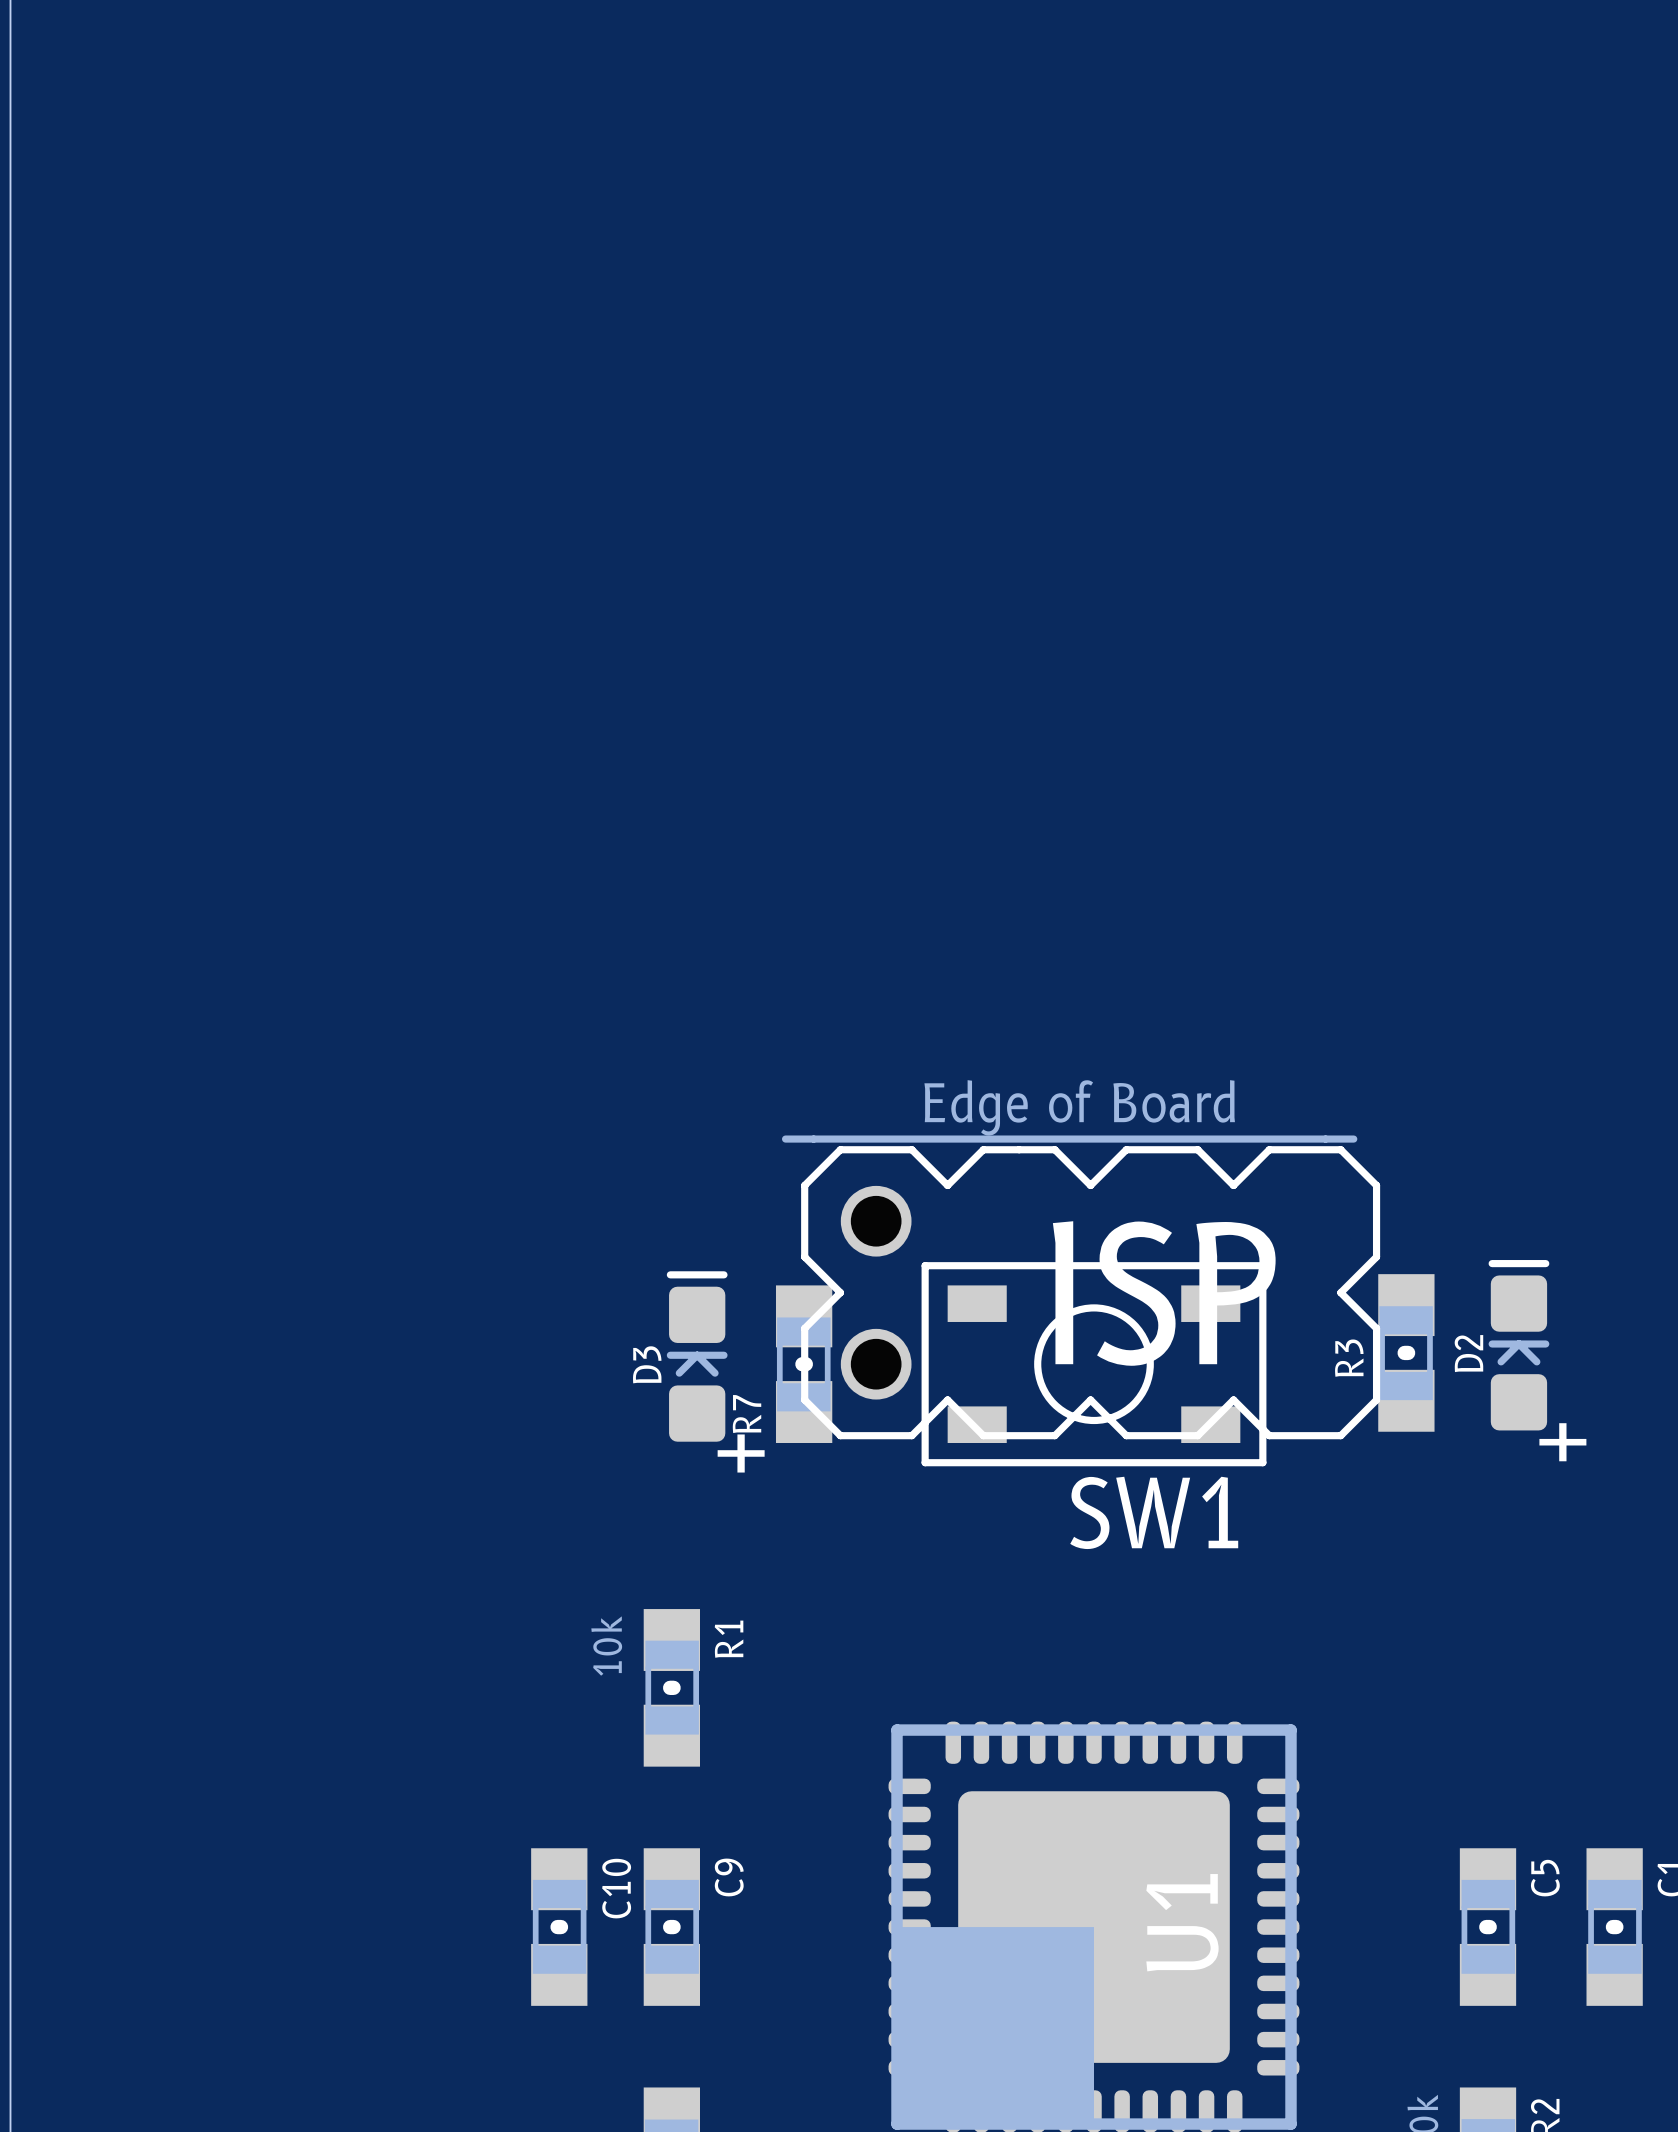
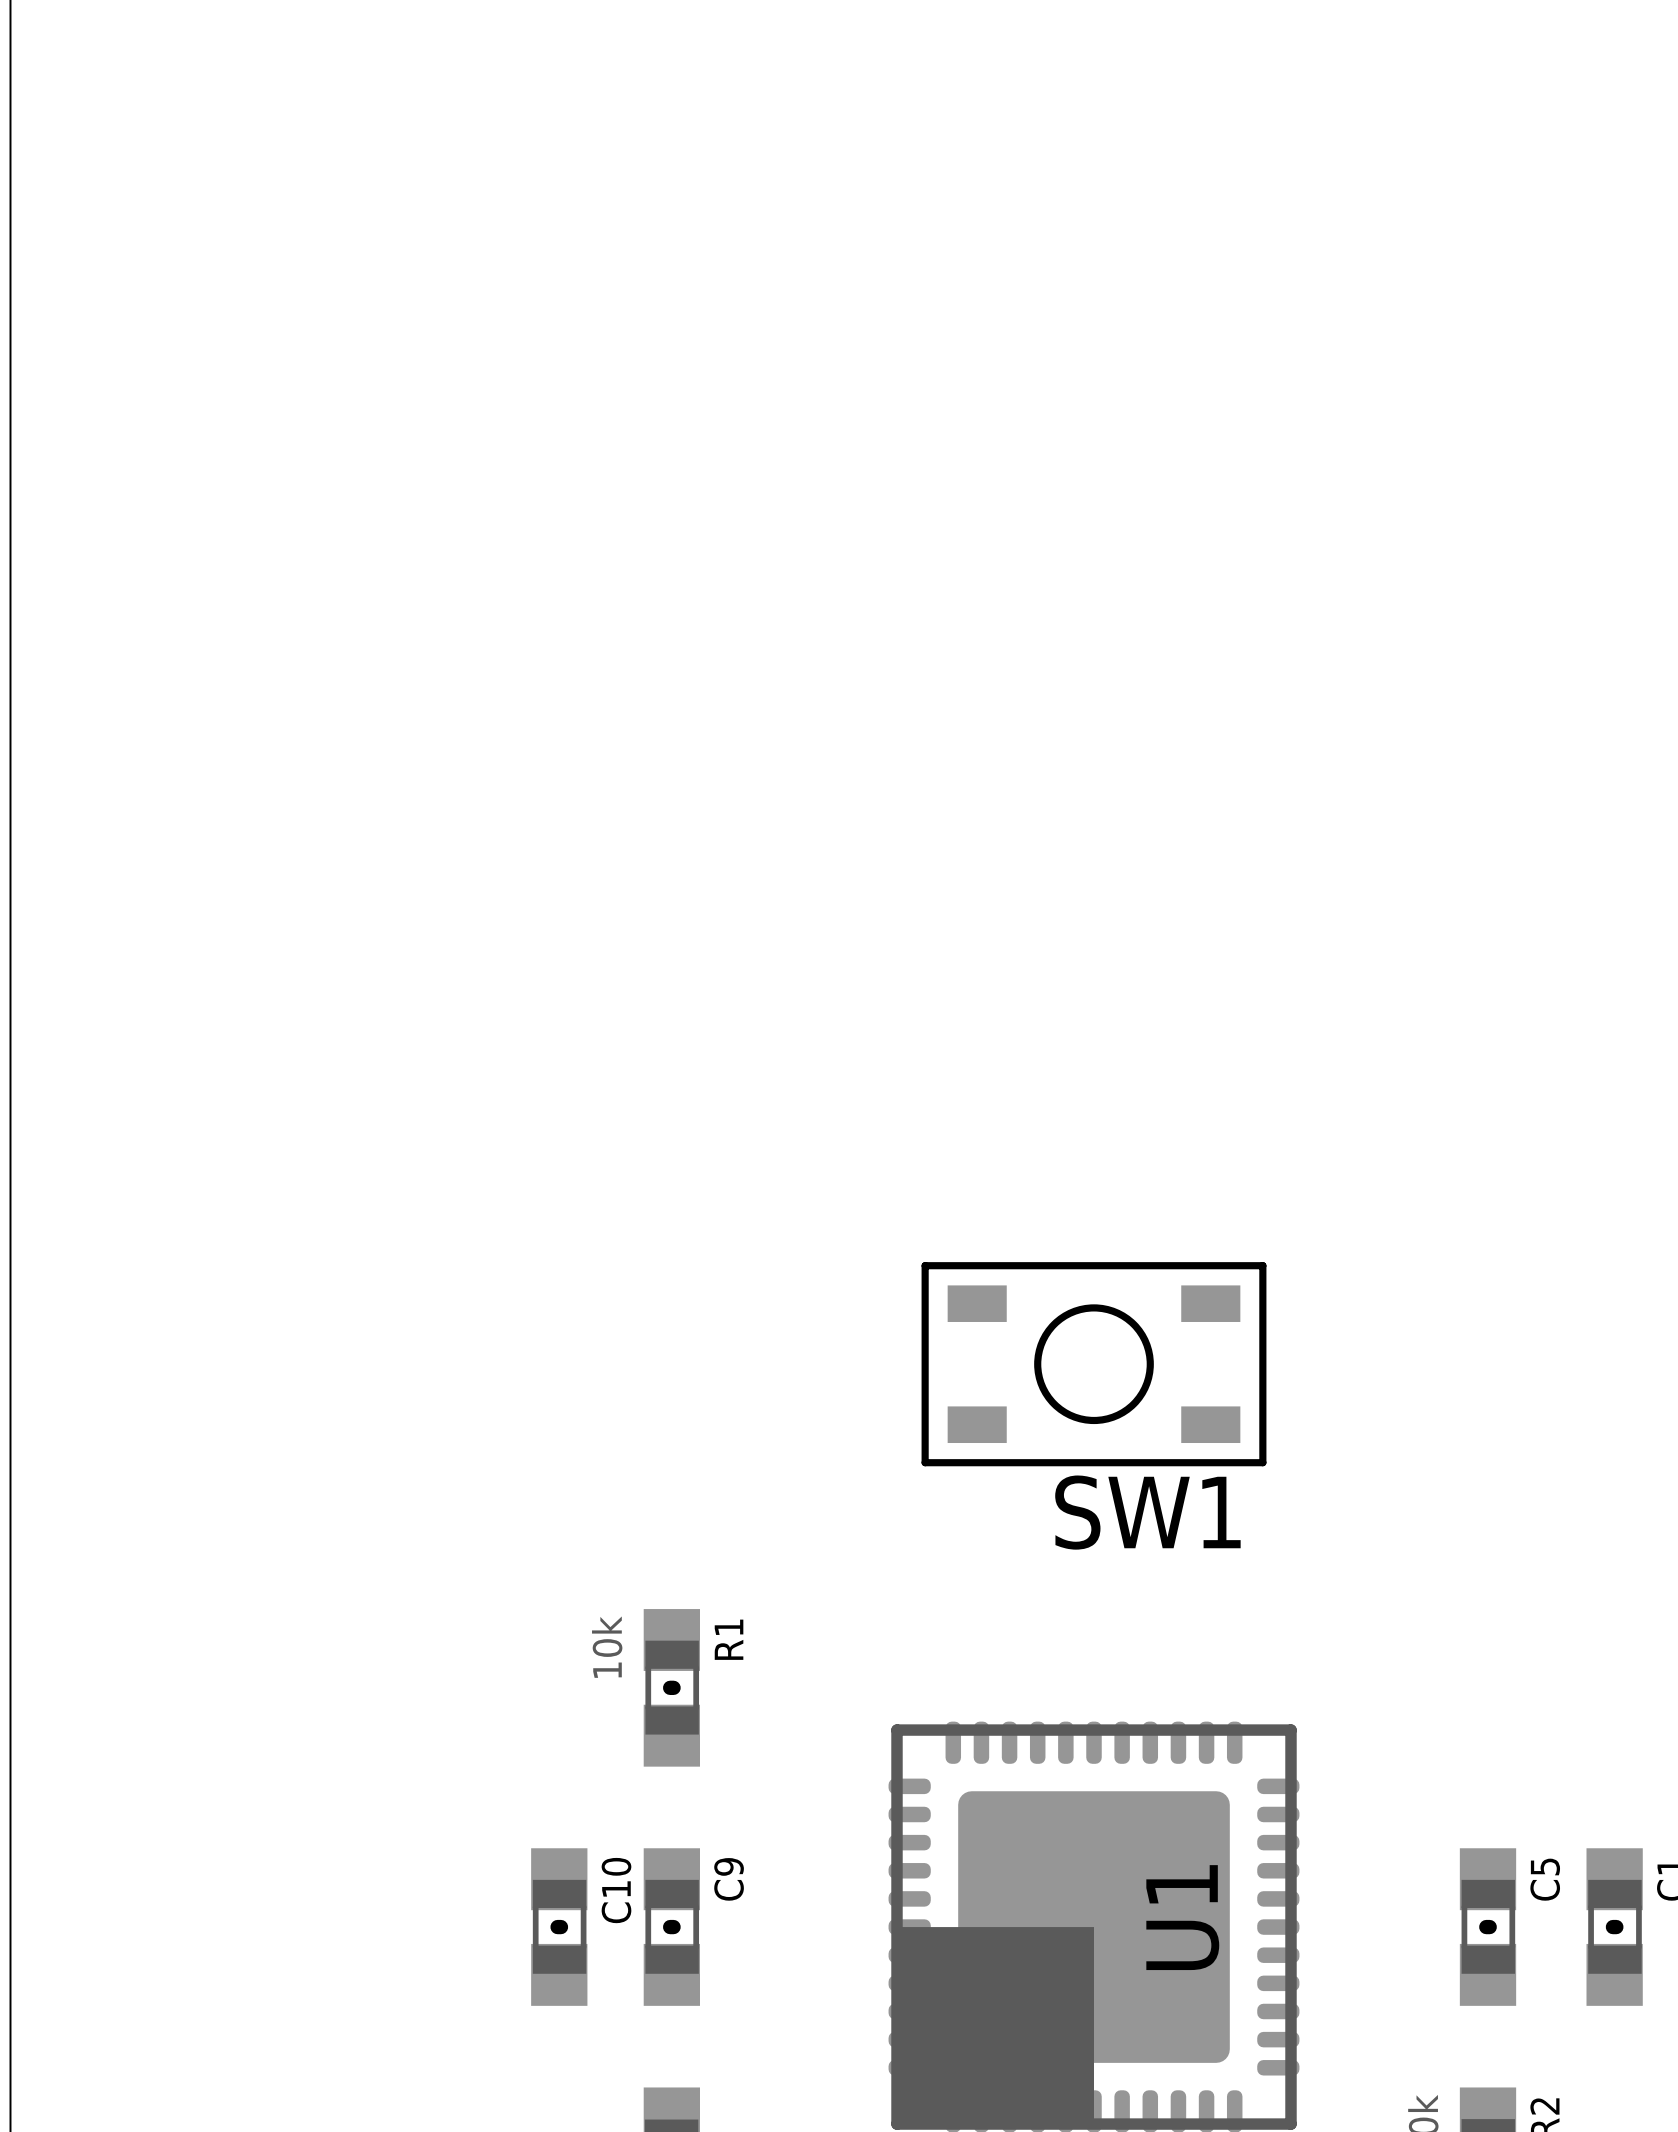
part: (1081, 1287) -> none
D2: (1518, 1345) -> none
R3: (1406, 1352) -> none
D3: (697, 1356) -> none
R7: (804, 1364) -> none

